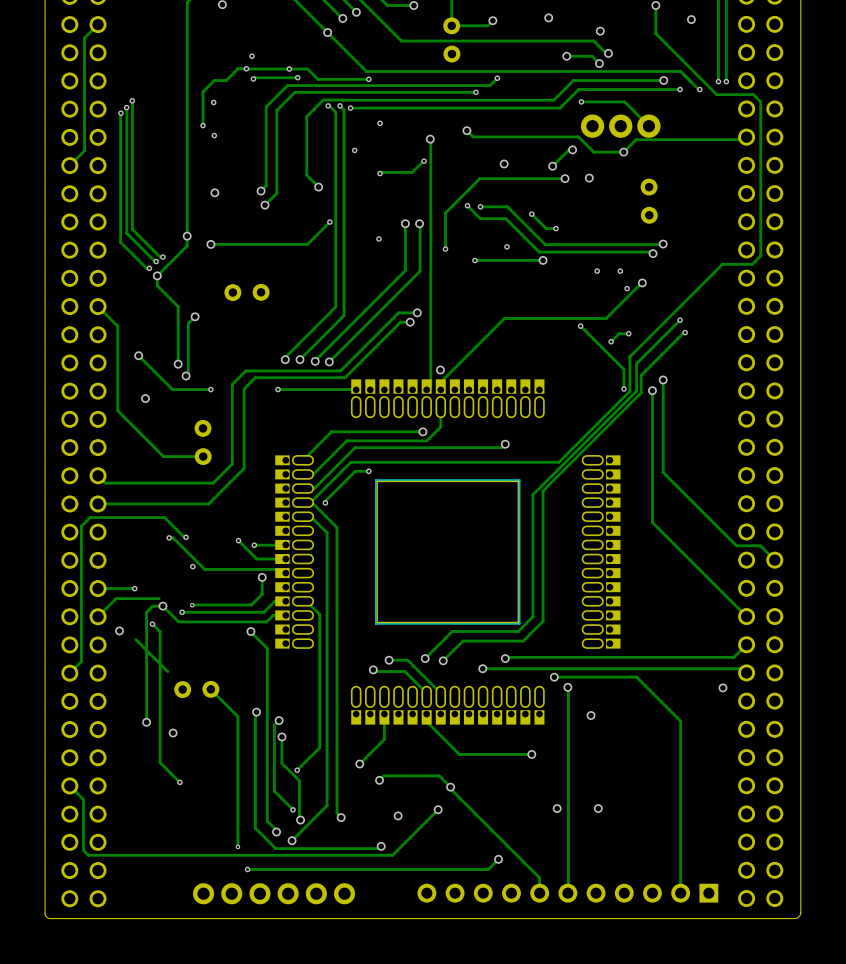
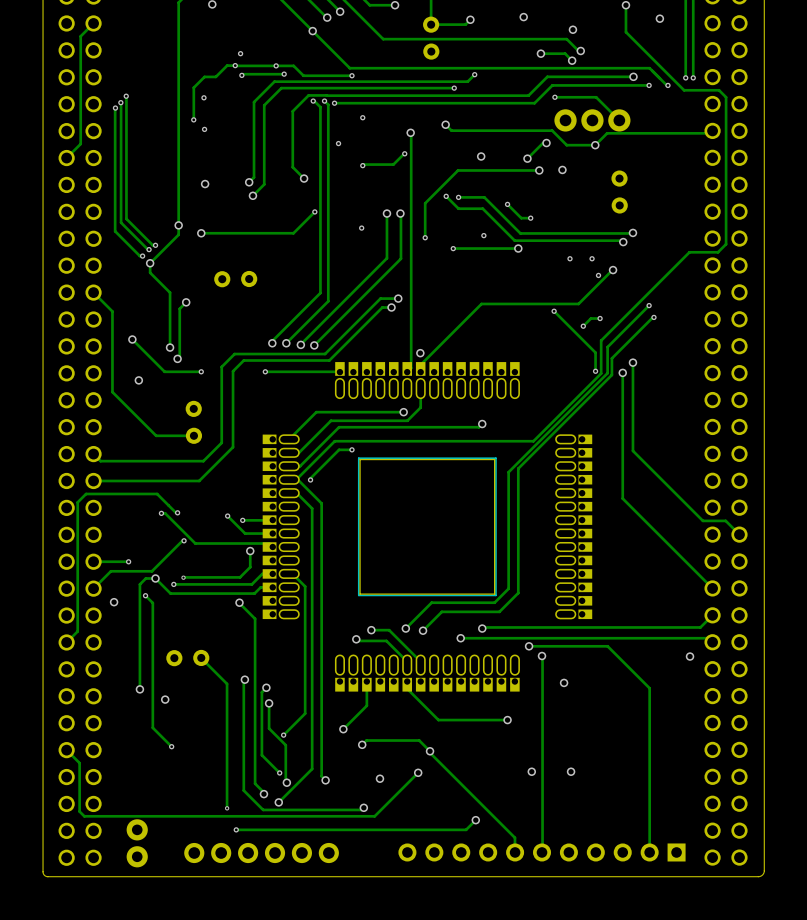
track: none -> (182, 540) (151, 571)
track: (135, 639) (167, 671) -> none
part: none -> (137, 843)

